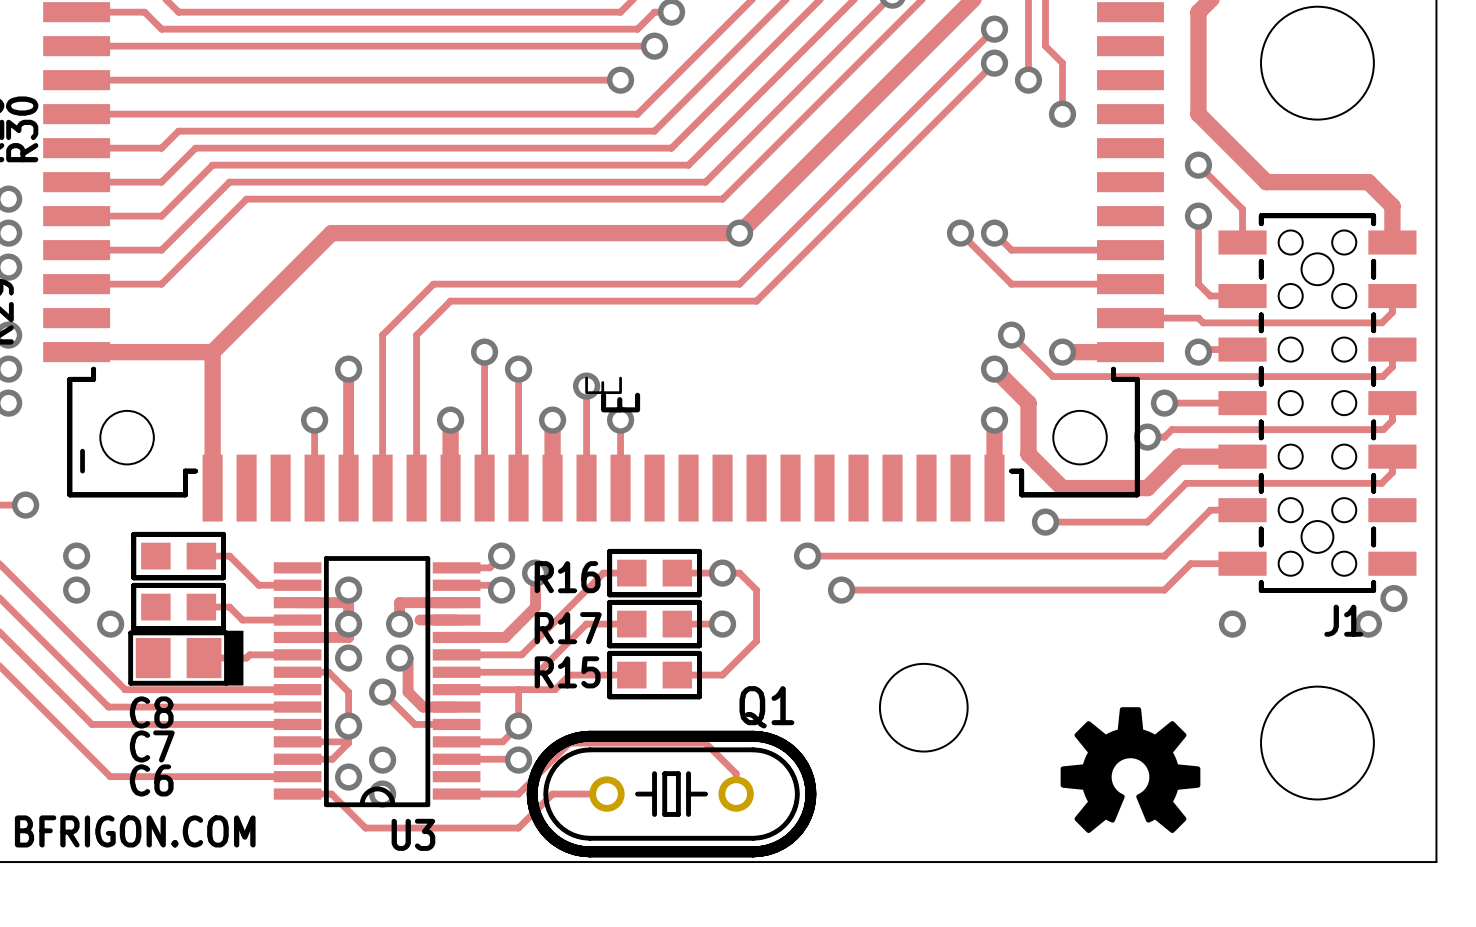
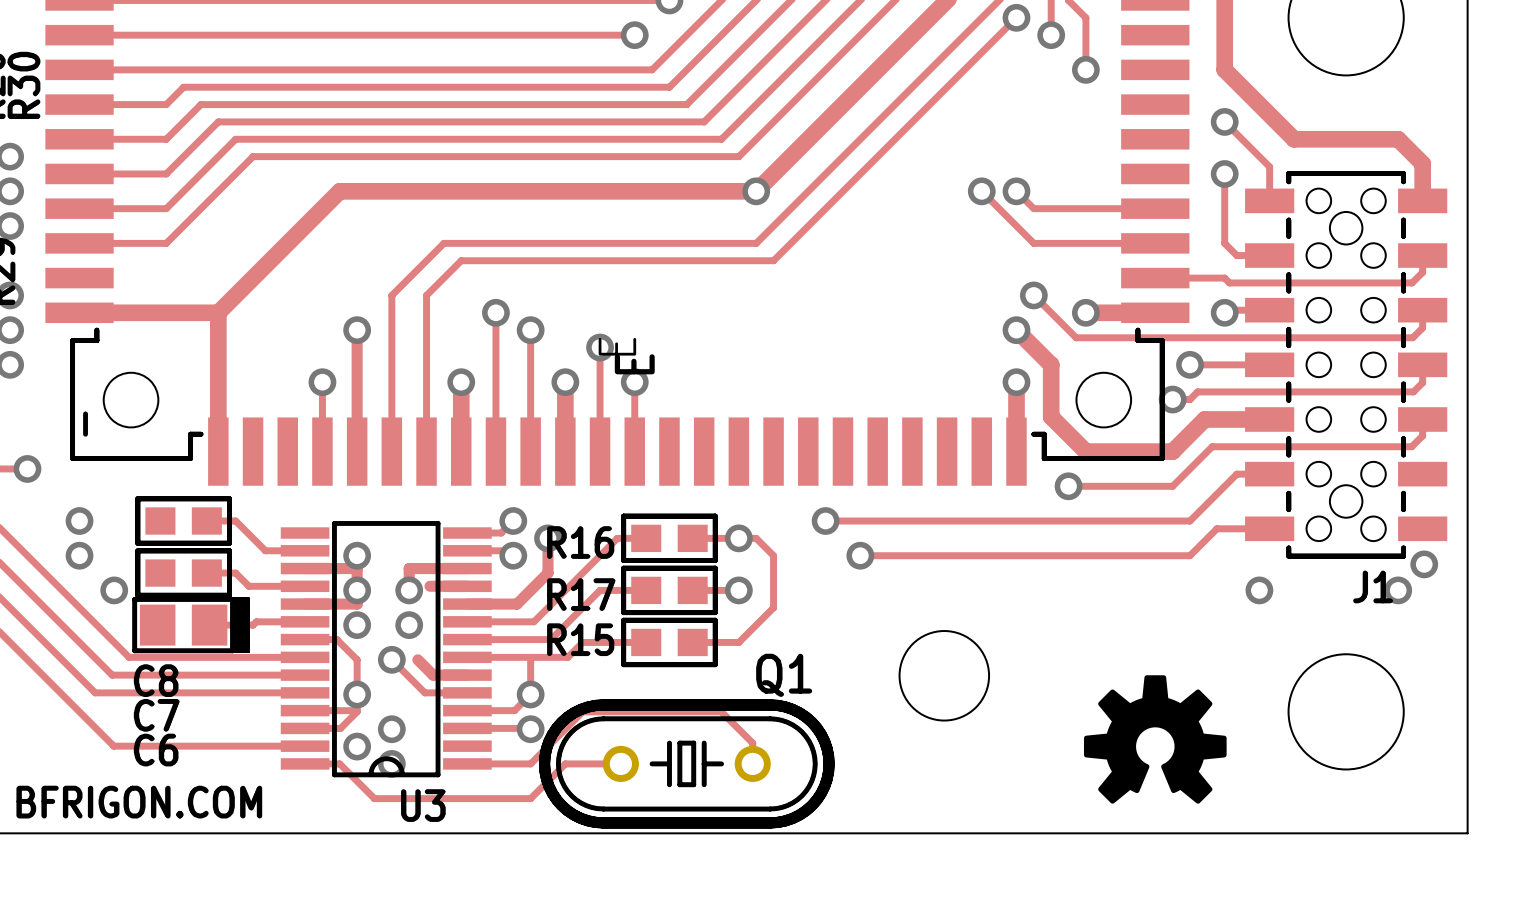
track: (399, 658) (408, 658) (408, 692) -> none

